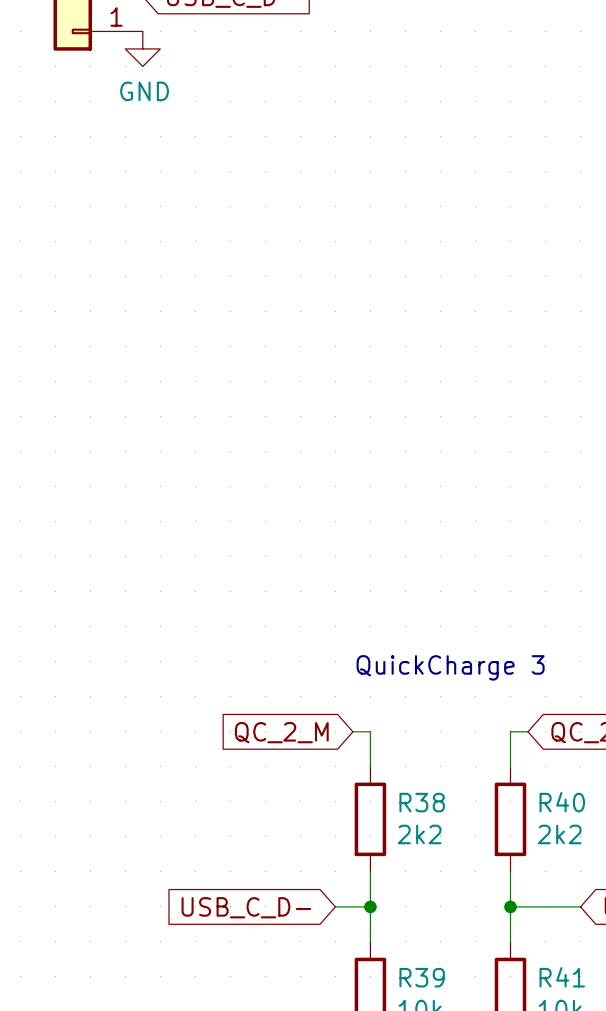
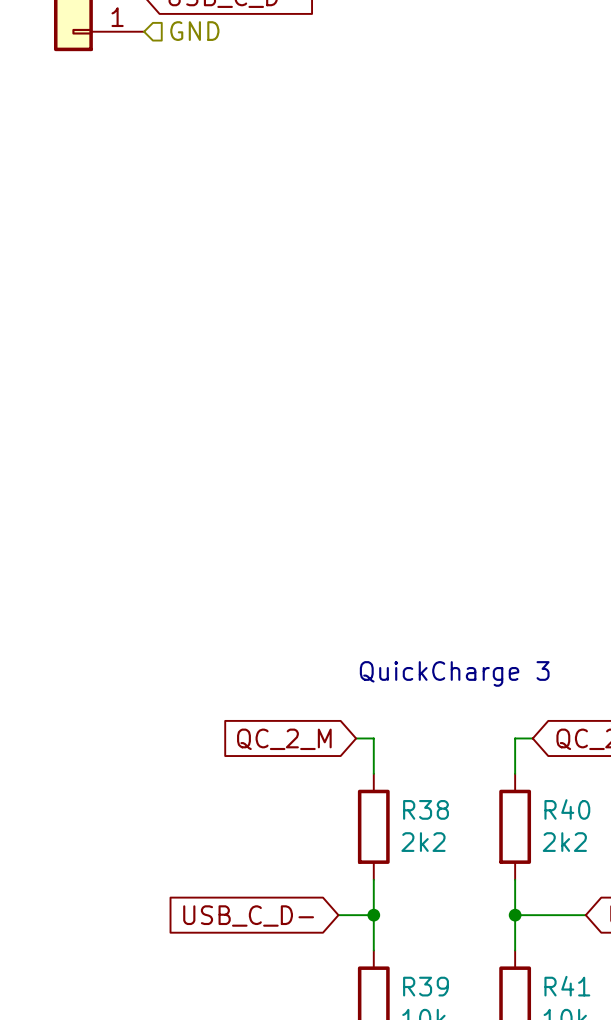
hierarchical label: none -> GND (194, 31)
power symbol: GND (142, 48) -> none

